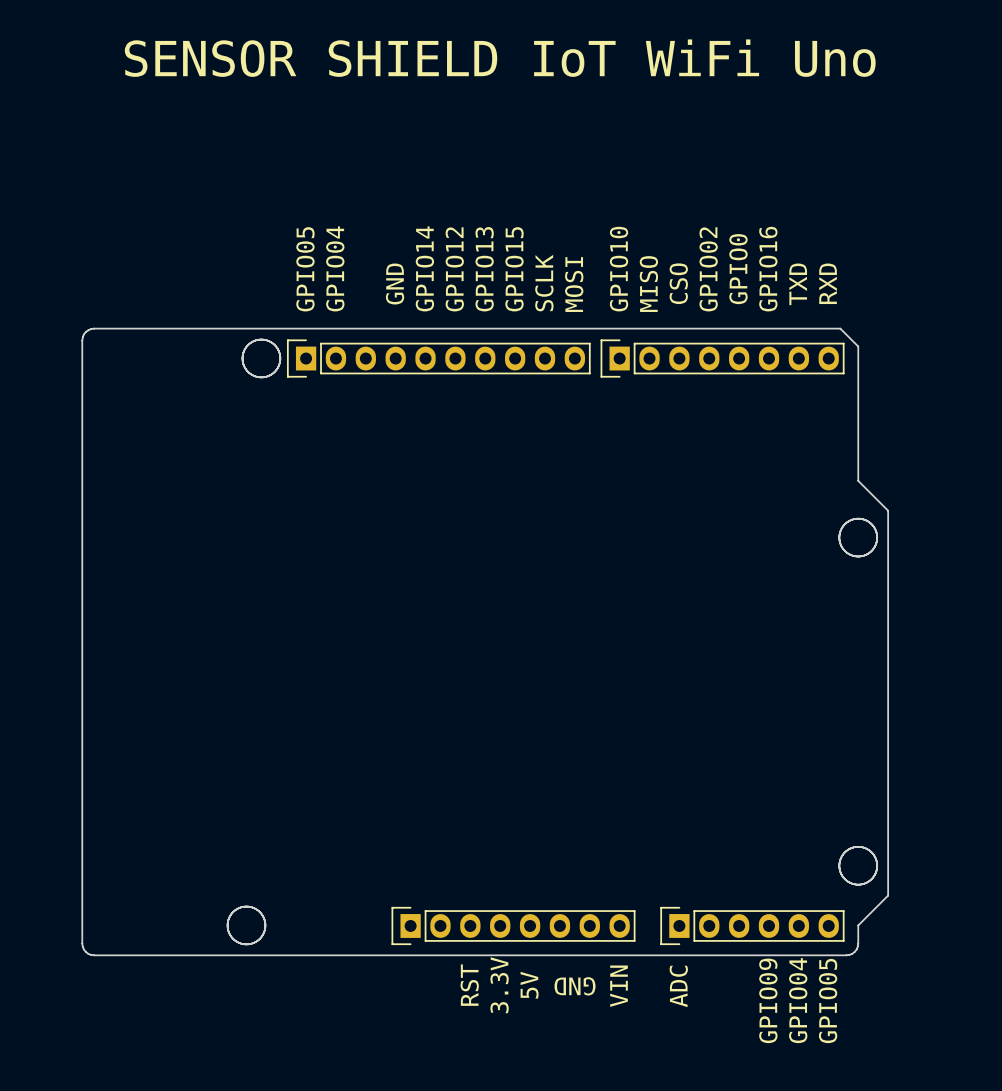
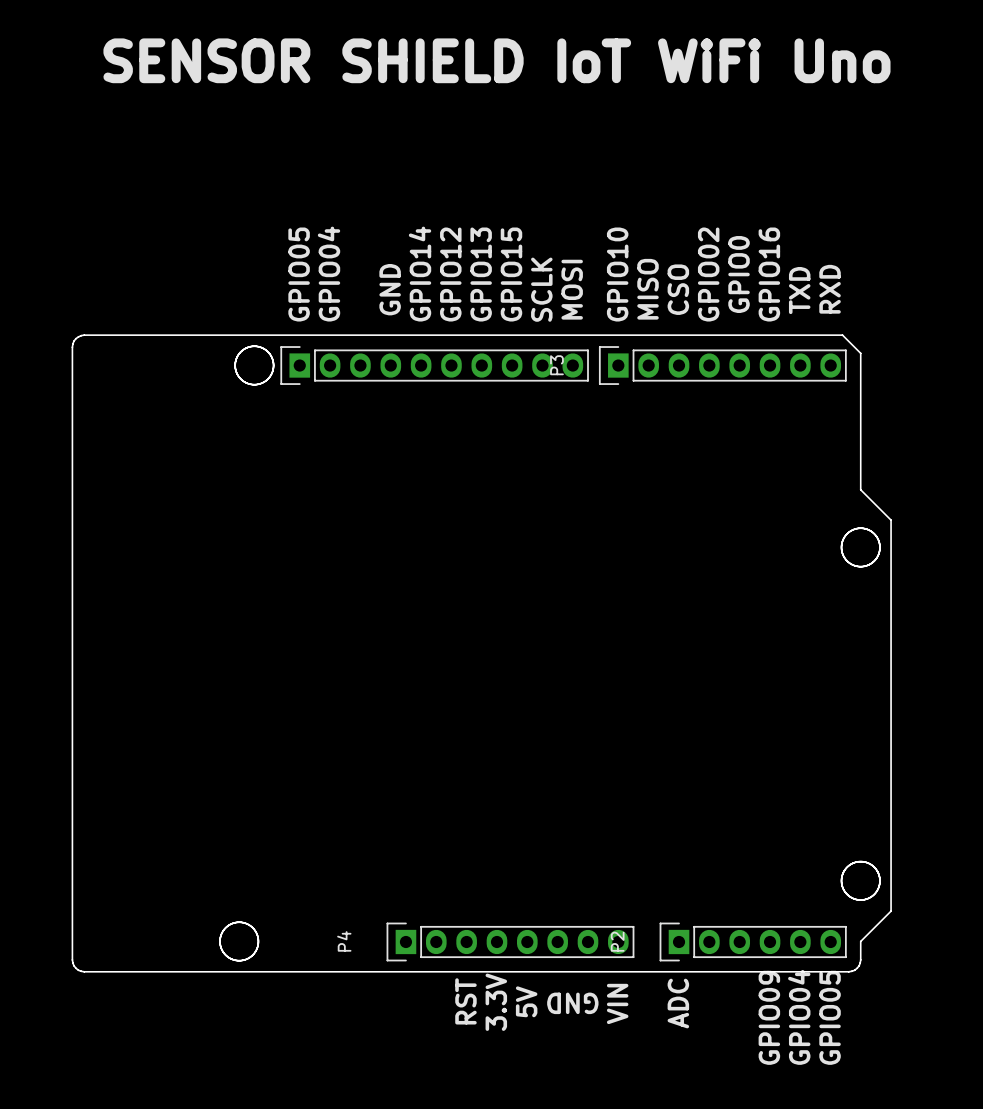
P3 name: none -> P3 (556, 365)
P4 name: none -> P4 (344, 941)
P2 name: none -> P2 (617, 941)

